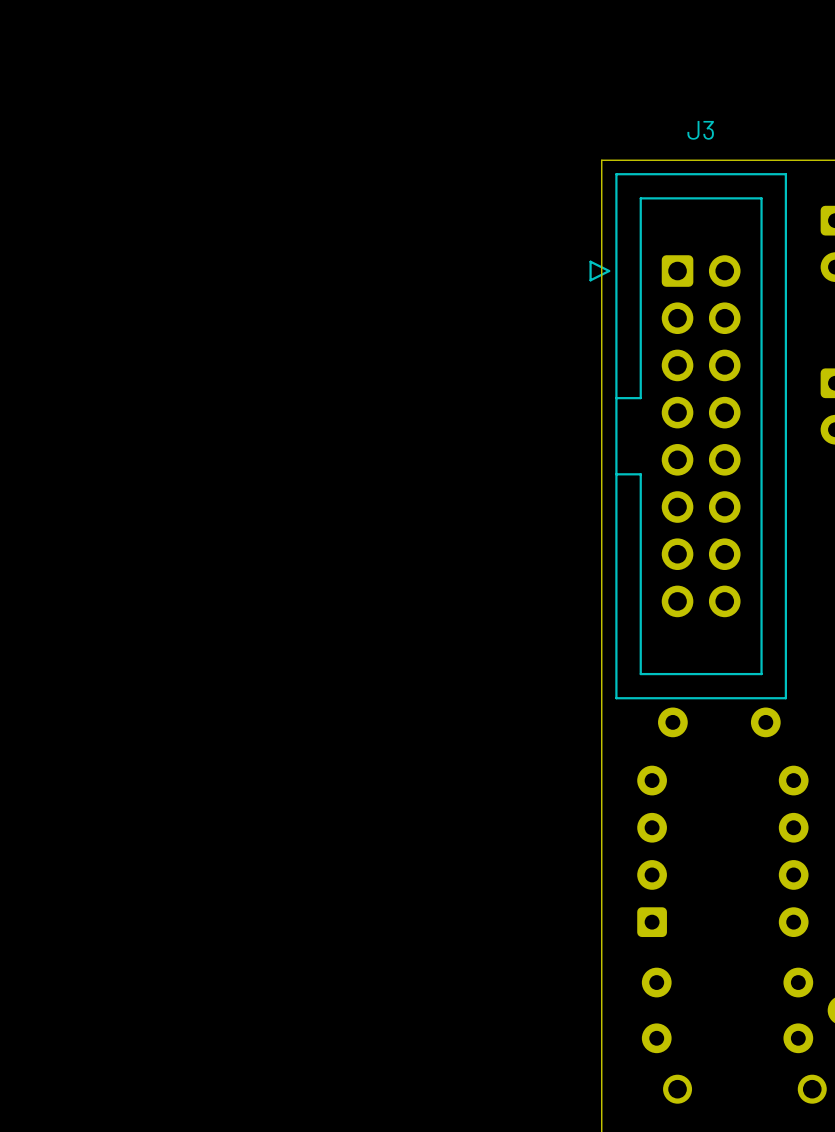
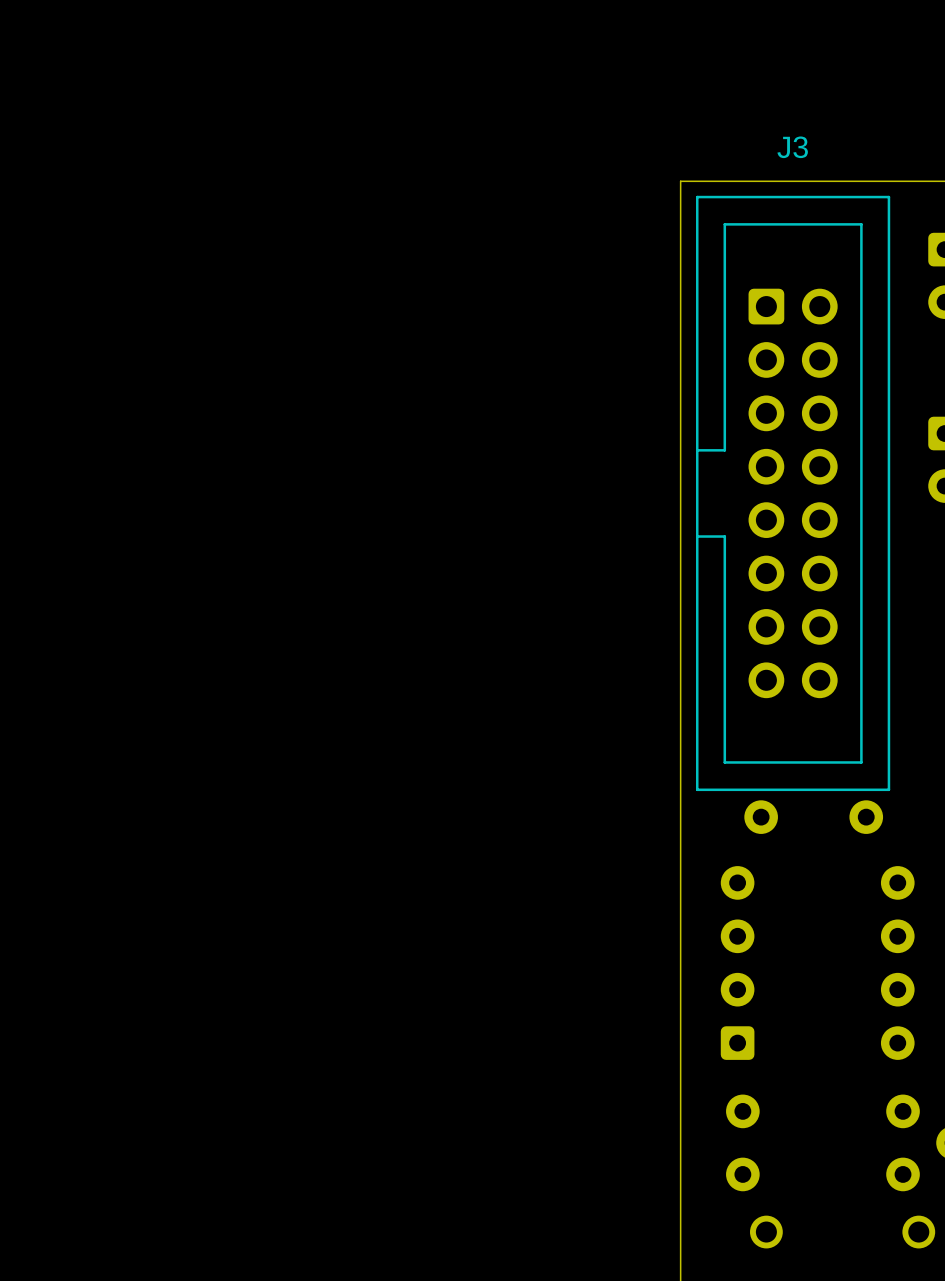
J3 footprint: [589, 173, 787, 700] -> [695, 195, 891, 792]

